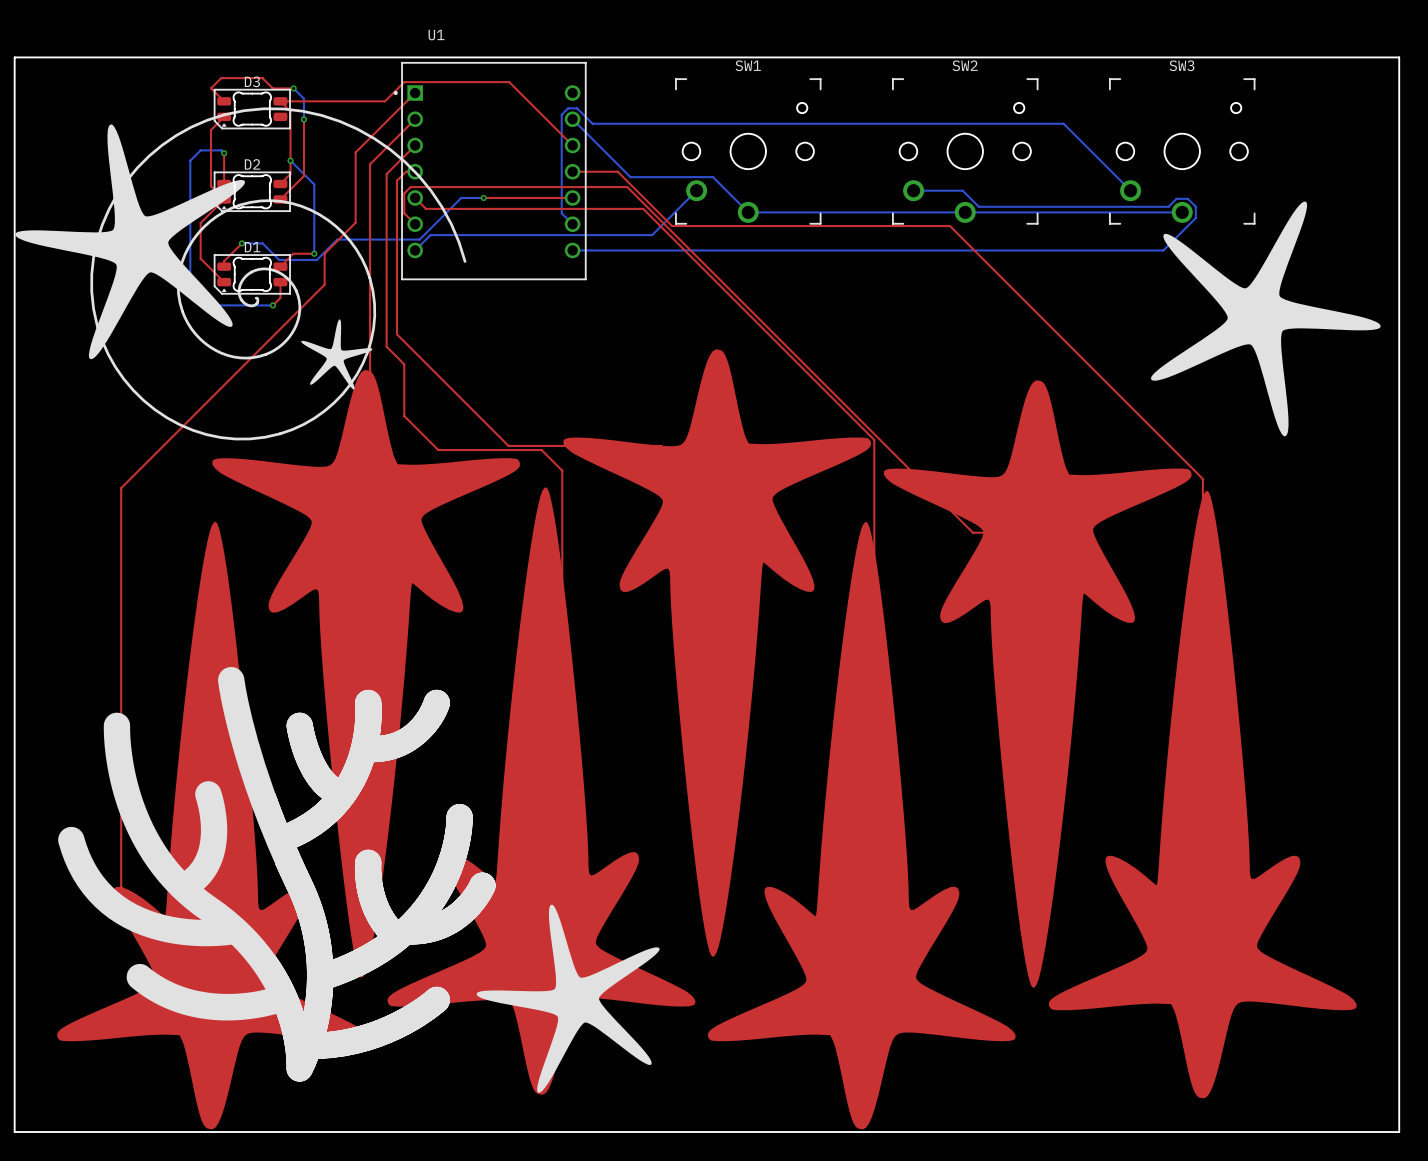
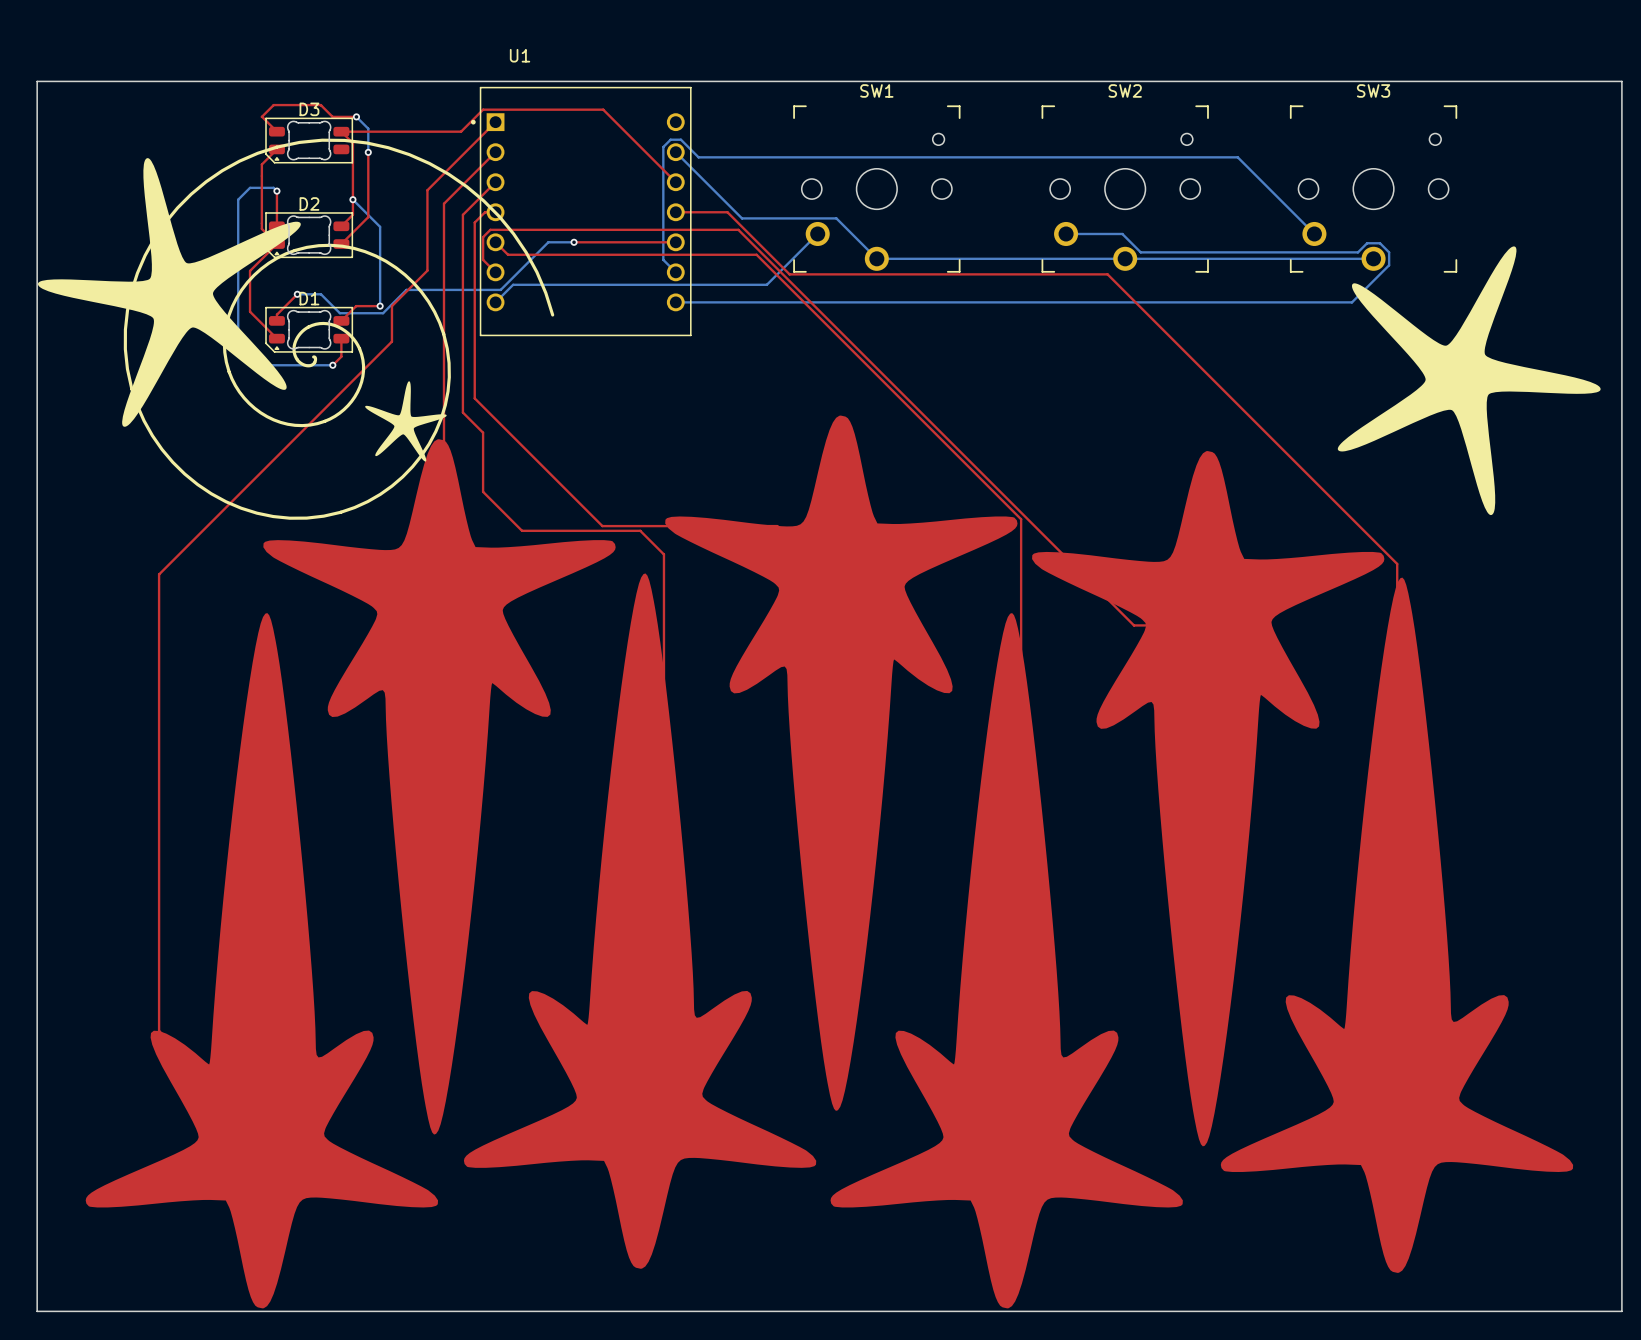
drawing: [58, 667, 660, 1093] -> none

